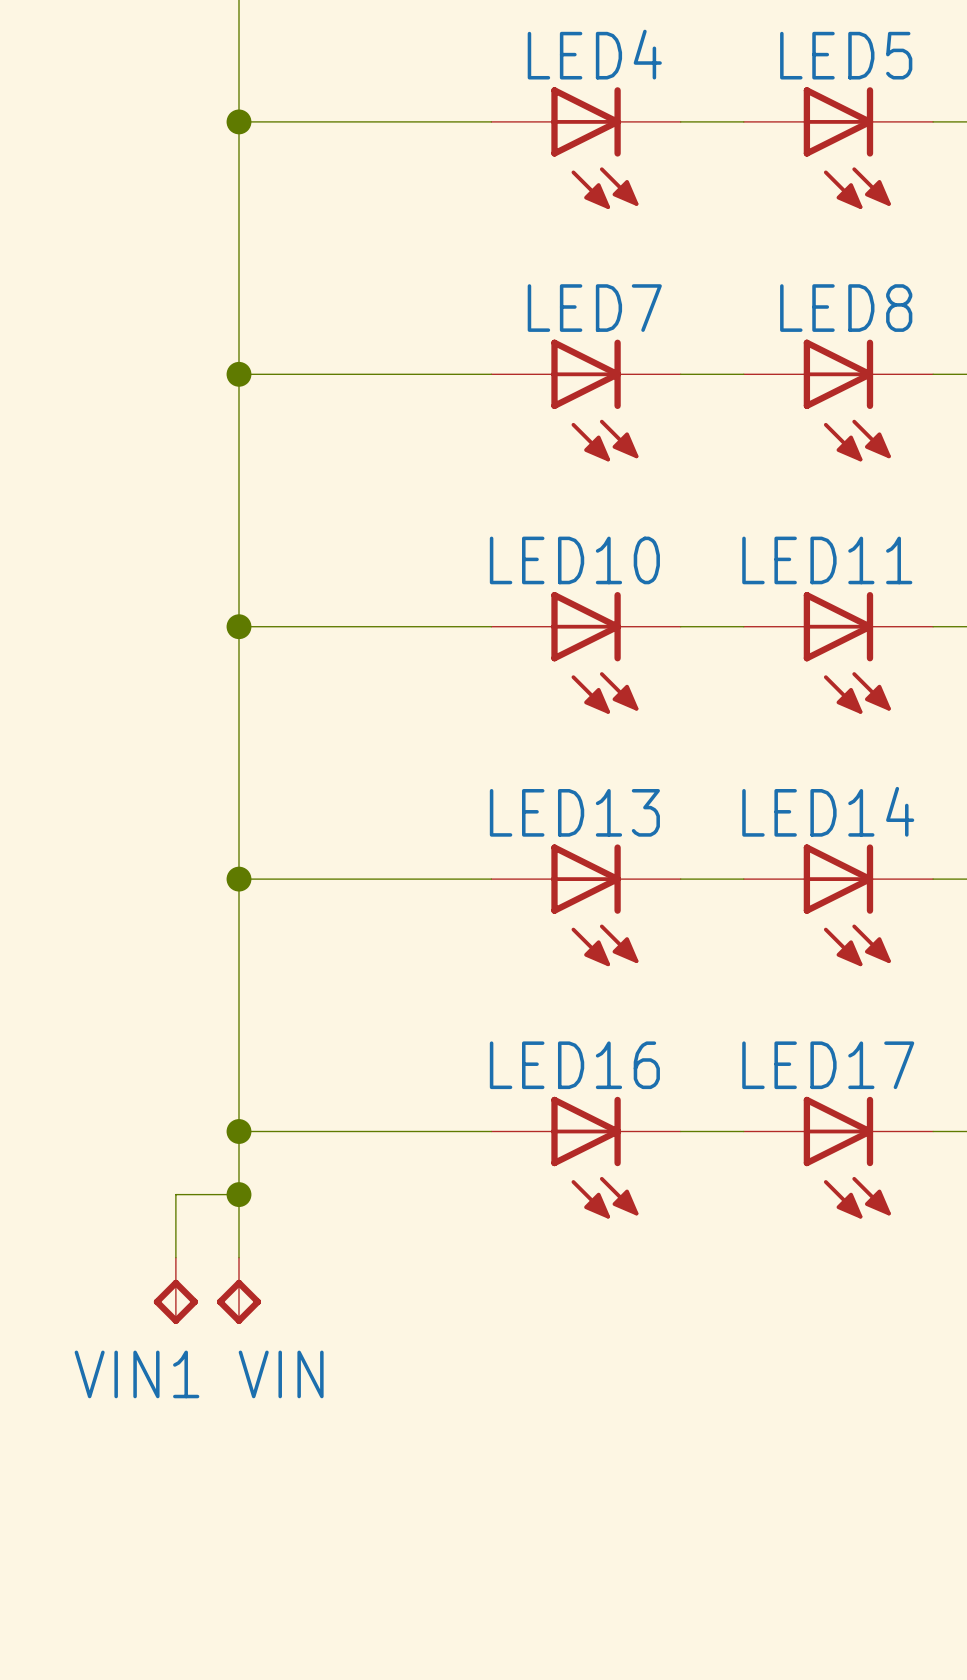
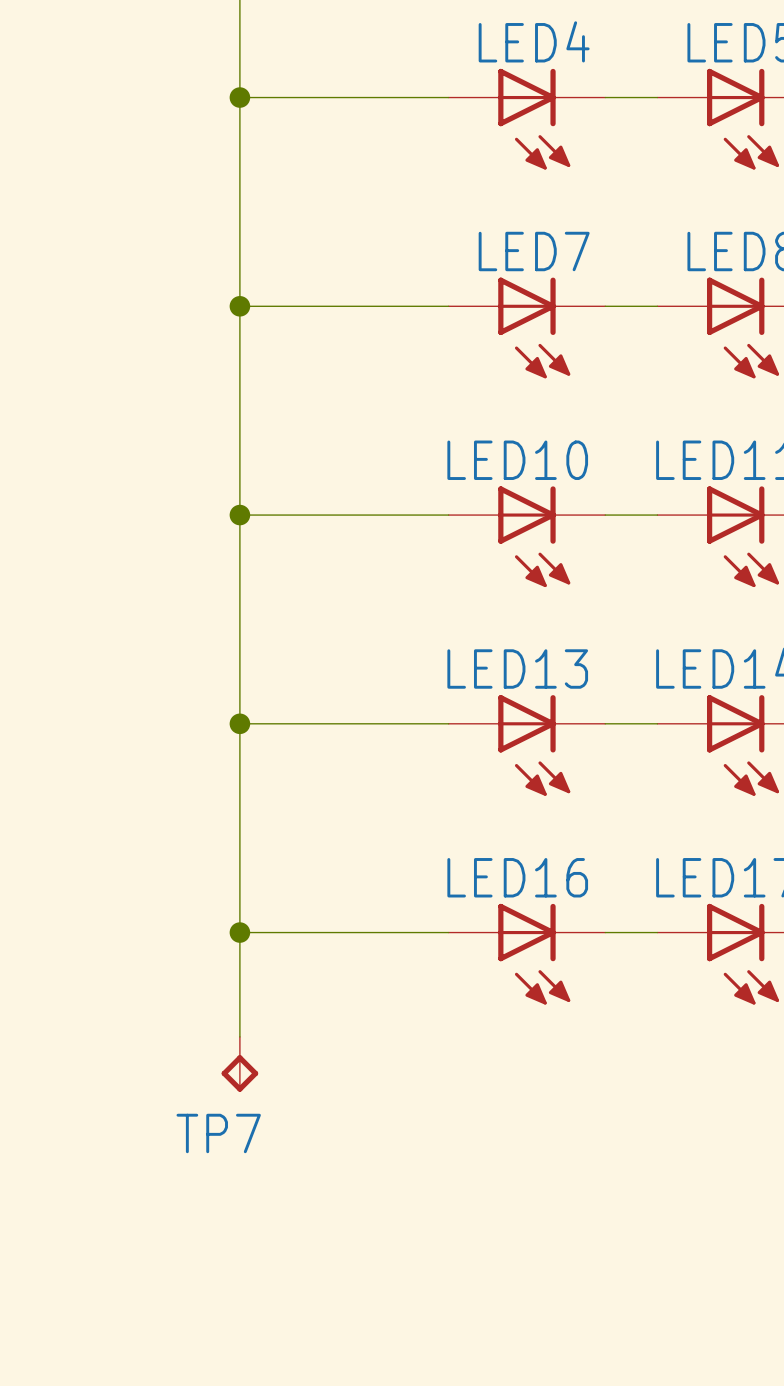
wire: (239, 1194) (175, 1194) (175, 1257) -> none
junction: (239, 1194) -> none
VIN1: (175, 1290) -> none
VIN name: VIN (281, 1374) -> TP7 (218, 1133)

